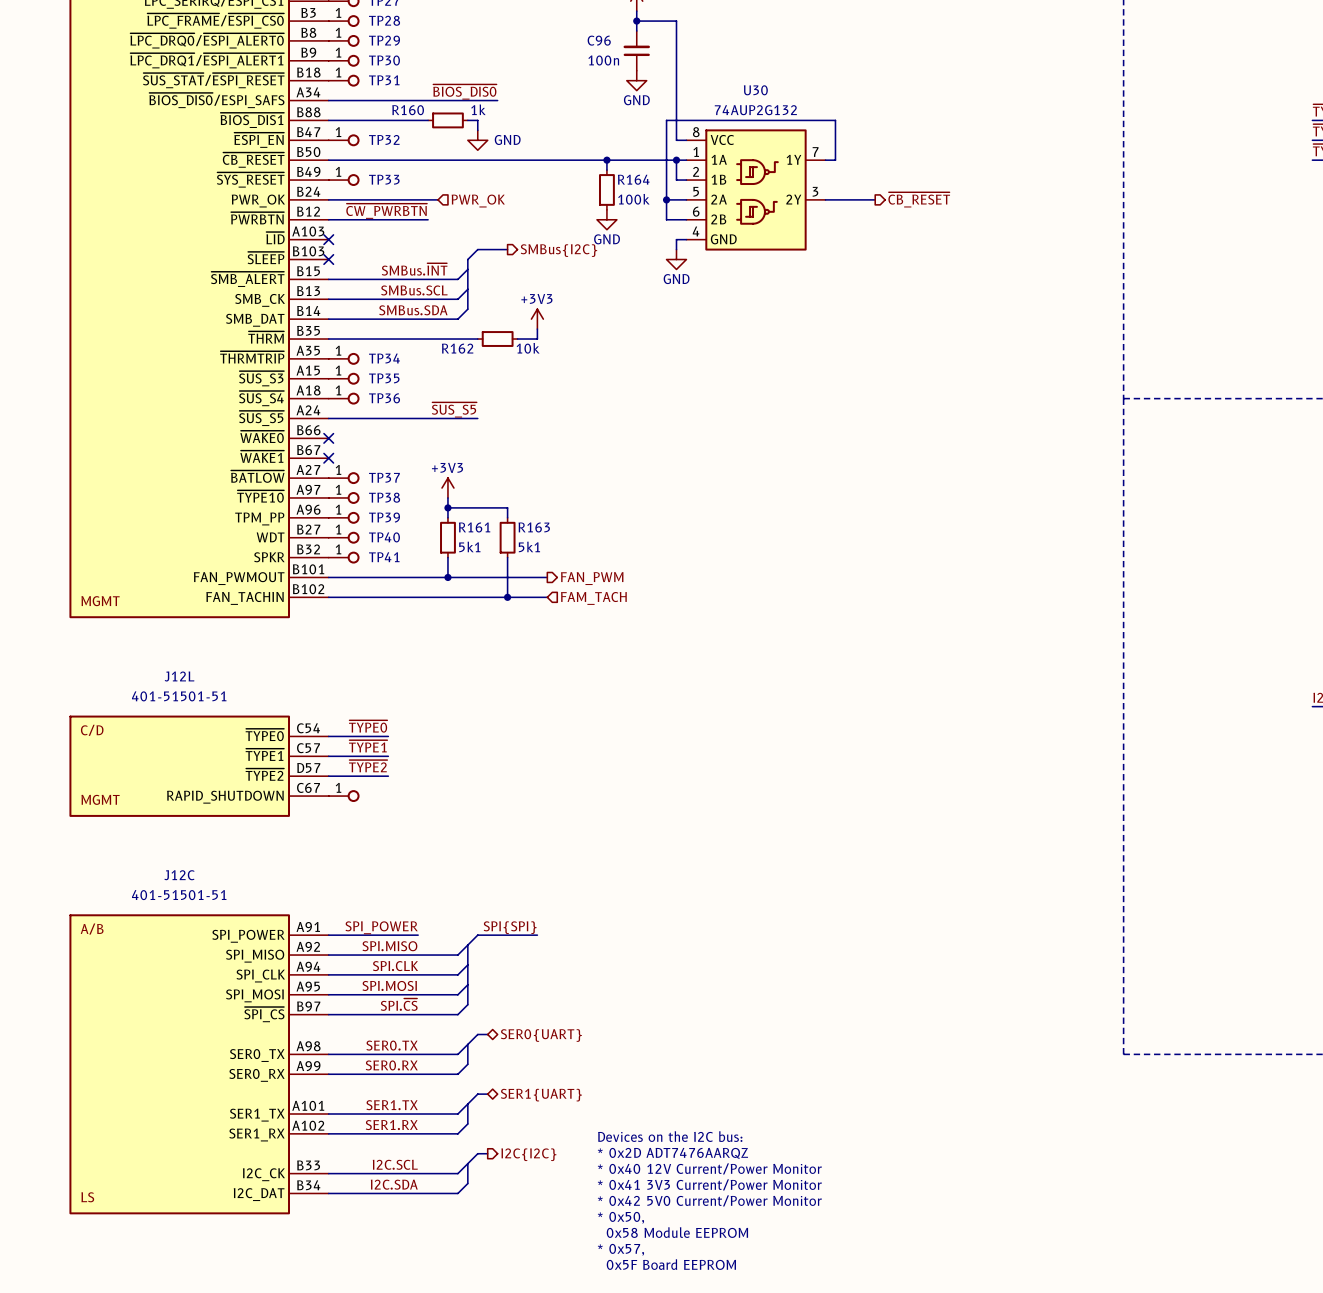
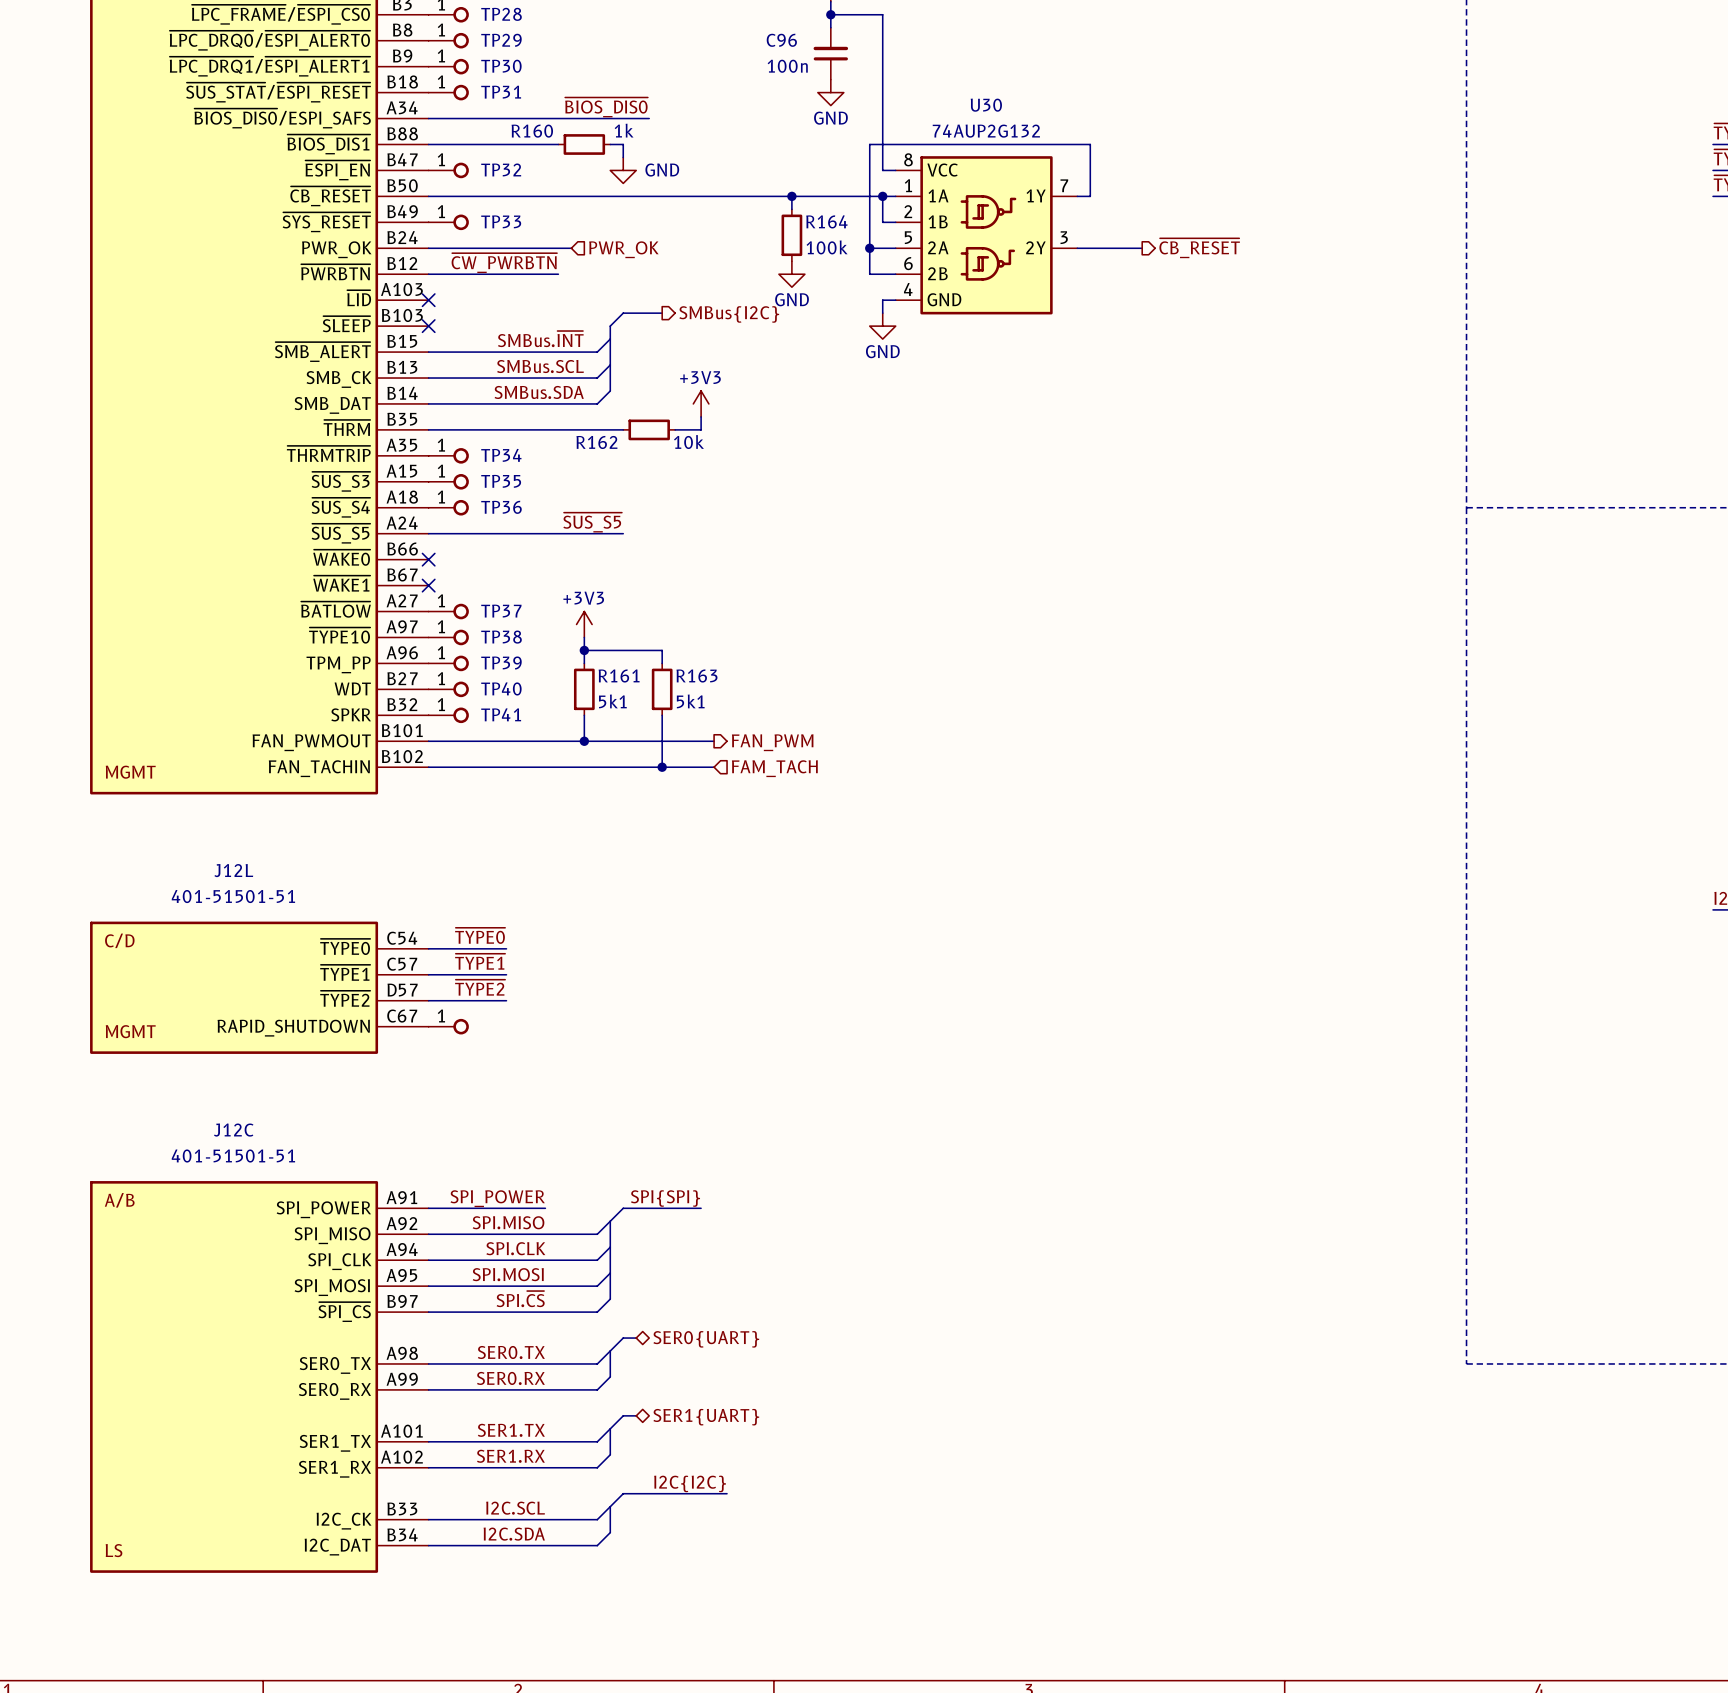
text: Devices on the I2C bus: (670, 1136) -> none
label: none -> I2C{I2C} (690, 1483)
bus: none -> (636, 1493) (727, 1493)
text: * 0x2D ADT7476AARQZ (672, 1153) -> none
hierarchical label: I2C{I2C} (528, 1154) -> none
text: * 0x40 12V Current/Power Monitor (709, 1168) -> none
text: * 0x41 3V3 Current/Power Monitor (709, 1184) -> none
text: * 0x42 5V0 Current/Power Monitor (709, 1200) -> none
text: * 0x50, (620, 1217) -> none
text: 0x58 Module EEPROM (677, 1232) -> none
text: * 0x57, (620, 1249) -> none
text: 0x5F Board EEPROM (671, 1264) -> none

